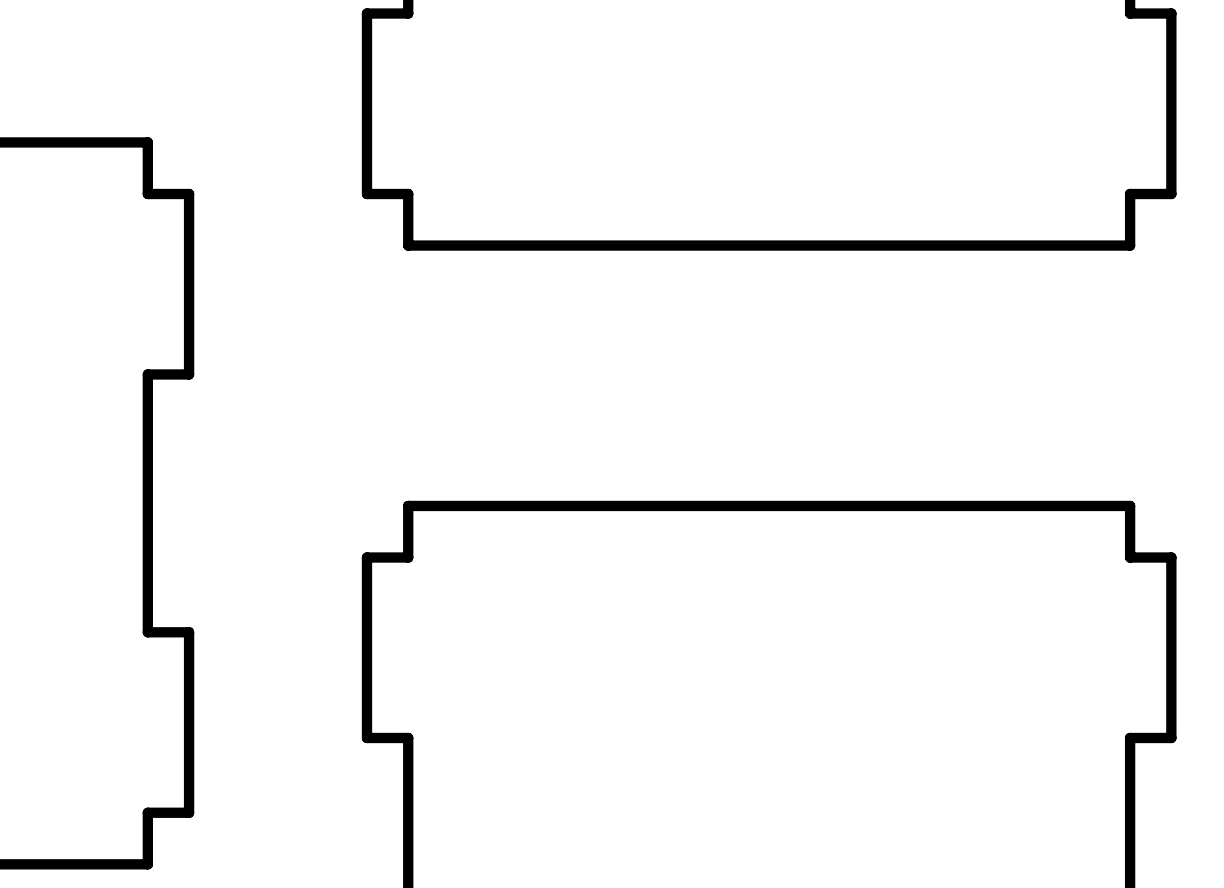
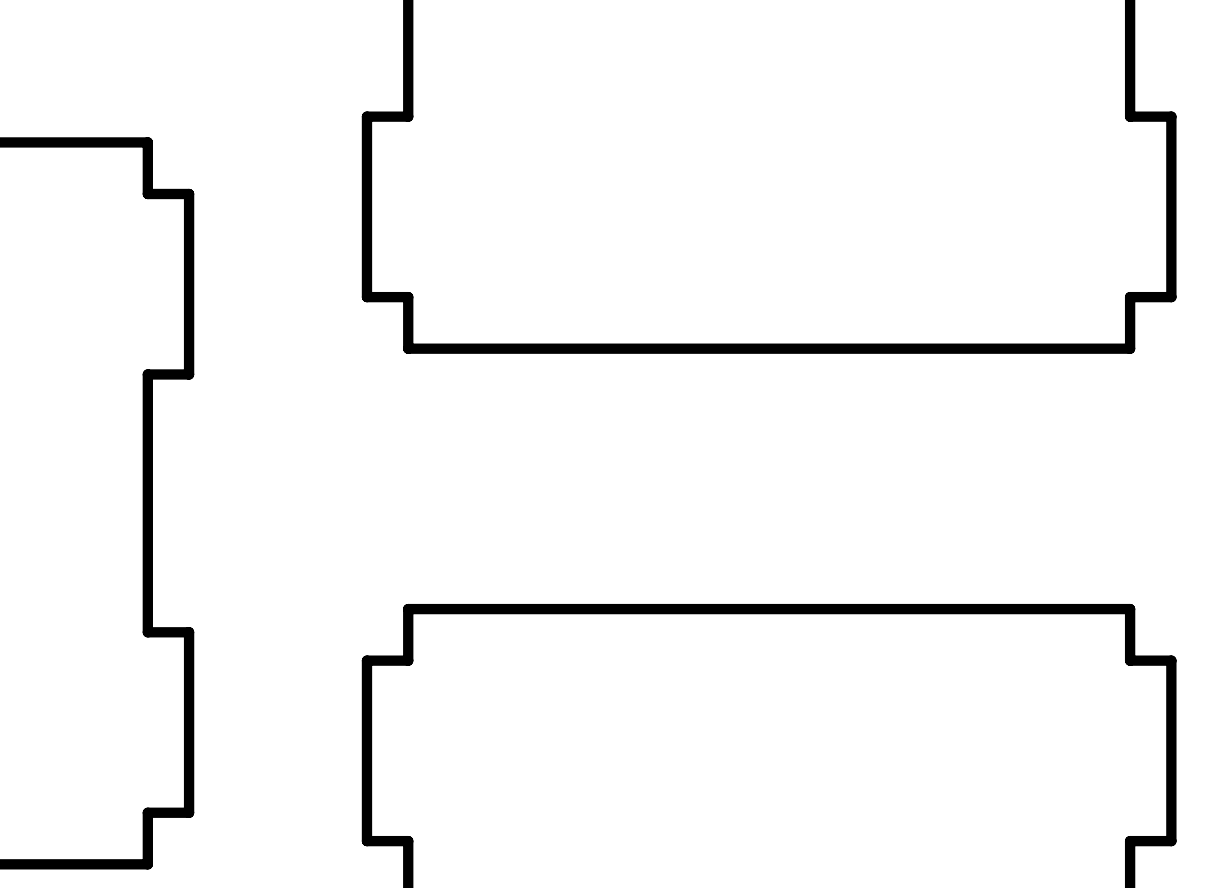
board edge: (408, 13) (366, 13) (366, 116) -> (408, 13) (408, 116) (366, 116)
board edge: (1130, 13) (1171, 13) (1171, 116) -> (1130, 13) (1130, 116) (1171, 116)
board edge: (366, 194) (408, 194) (408, 245) (1130, 245) (1130, 194) (1171, 194) -> (366, 194) (366, 297) (408, 297) (408, 348) (1130, 348) (1130, 297) (1171, 297) (1171, 194)
board edge: (366, 660) (366, 557) (408, 557) (408, 505) (1130, 505) (1130, 557) (1171, 557) (1171, 660) -> (366, 660) (408, 660) (408, 609) (1130, 609) (1130, 660) (1171, 660)
board edge: (366, 737) (408, 737) (408, 841) -> (366, 737) (366, 841) (408, 841)
board edge: (1171, 737) (1130, 737) (1130, 841) -> (1171, 737) (1171, 841) (1130, 841)

